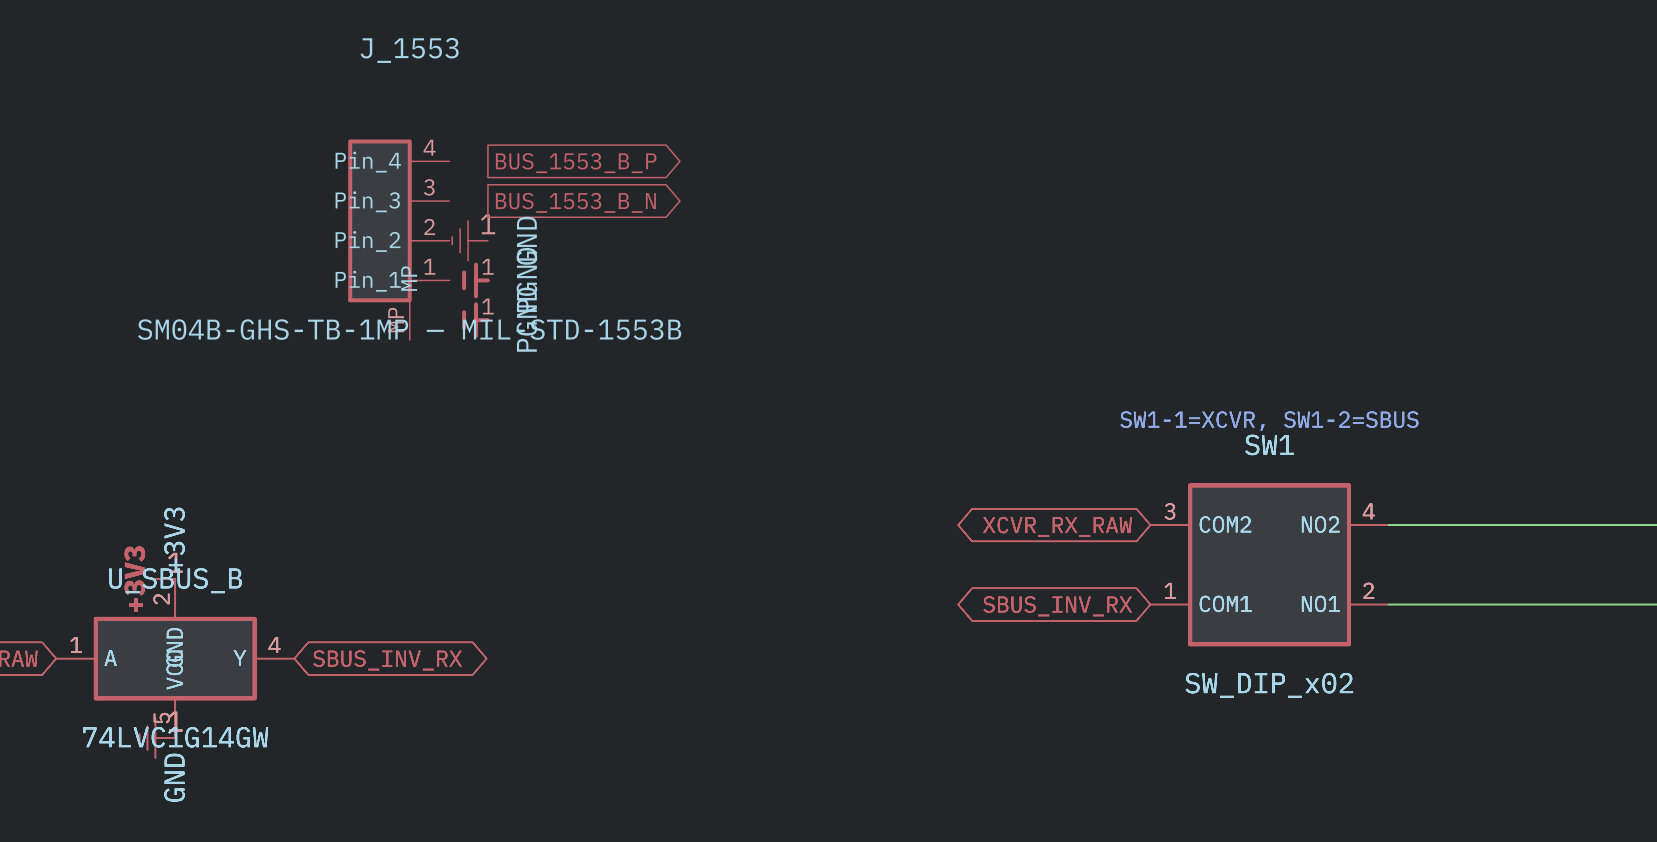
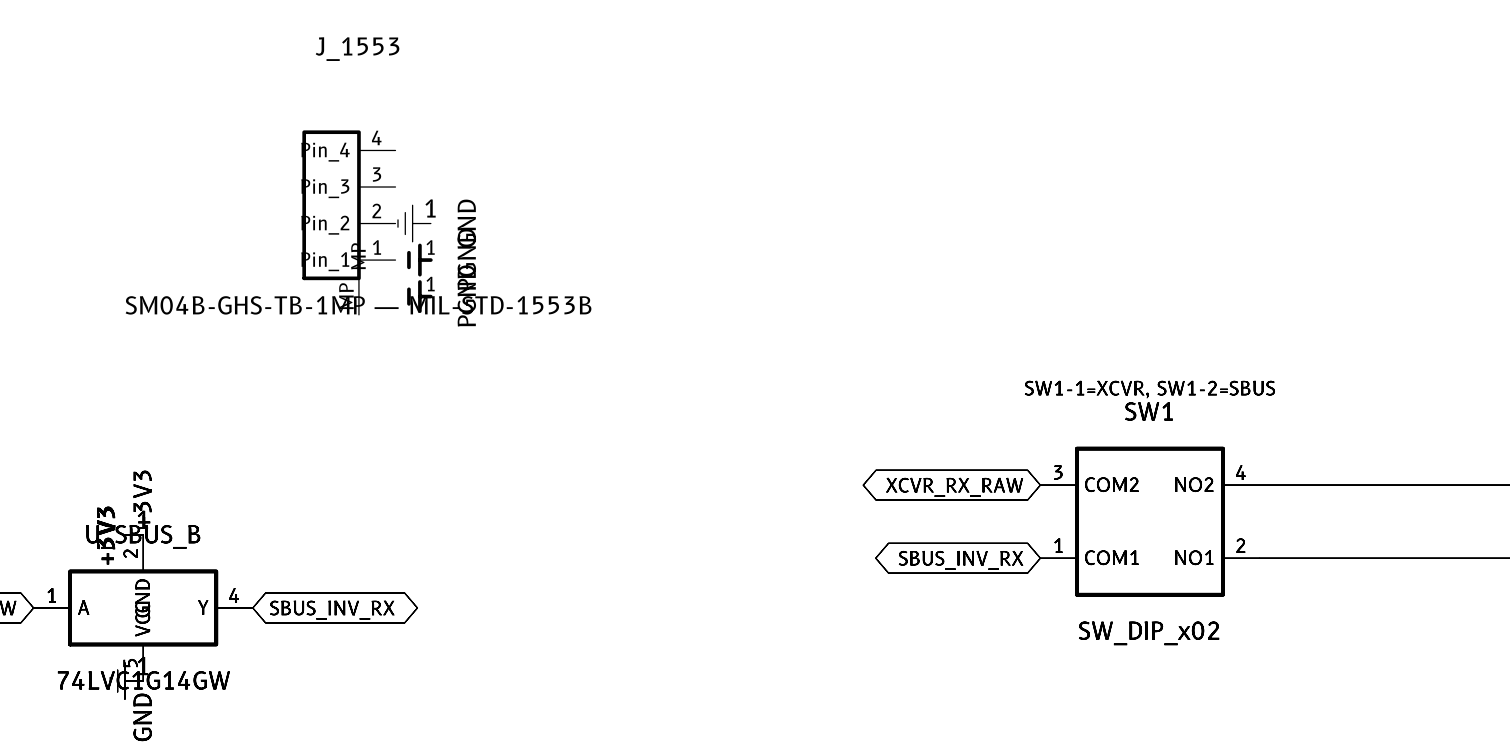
global label: BUS_1553_B_P (576, 163) -> none
global label: BUS_1553_B_N (575, 202) -> none

